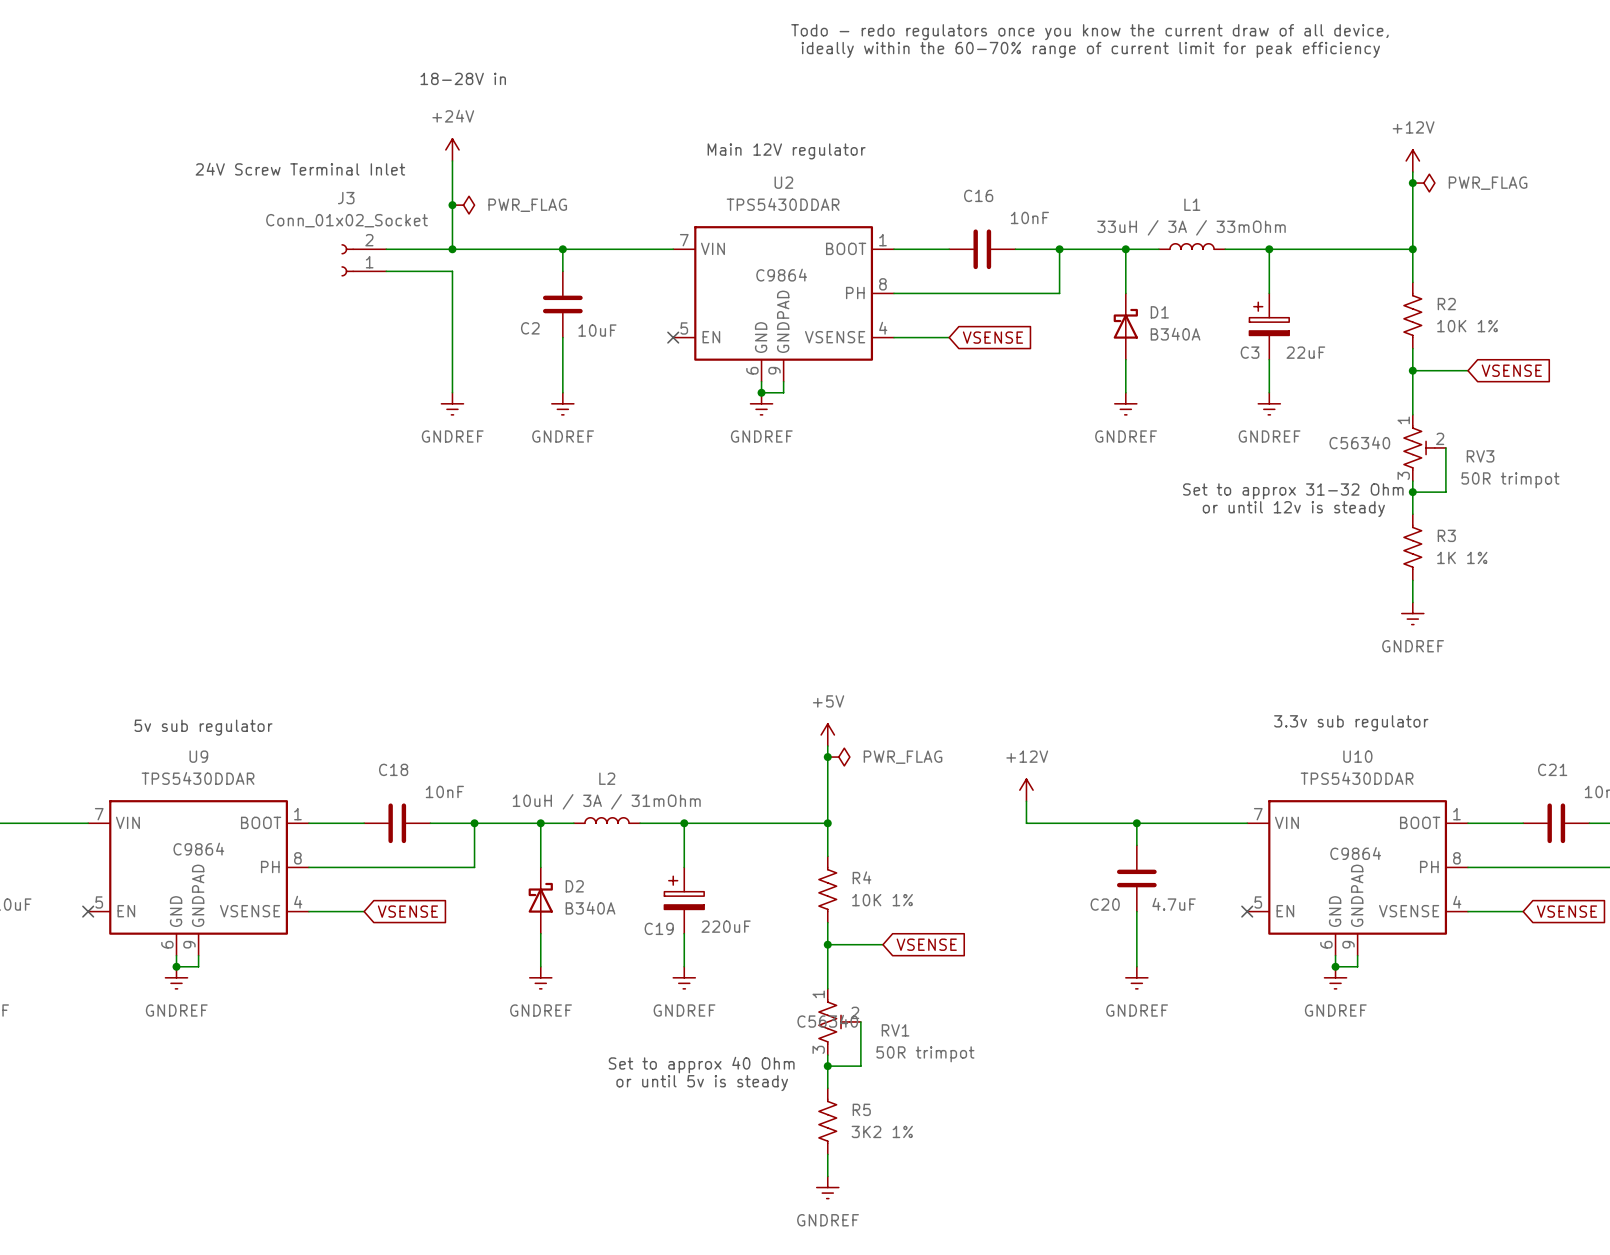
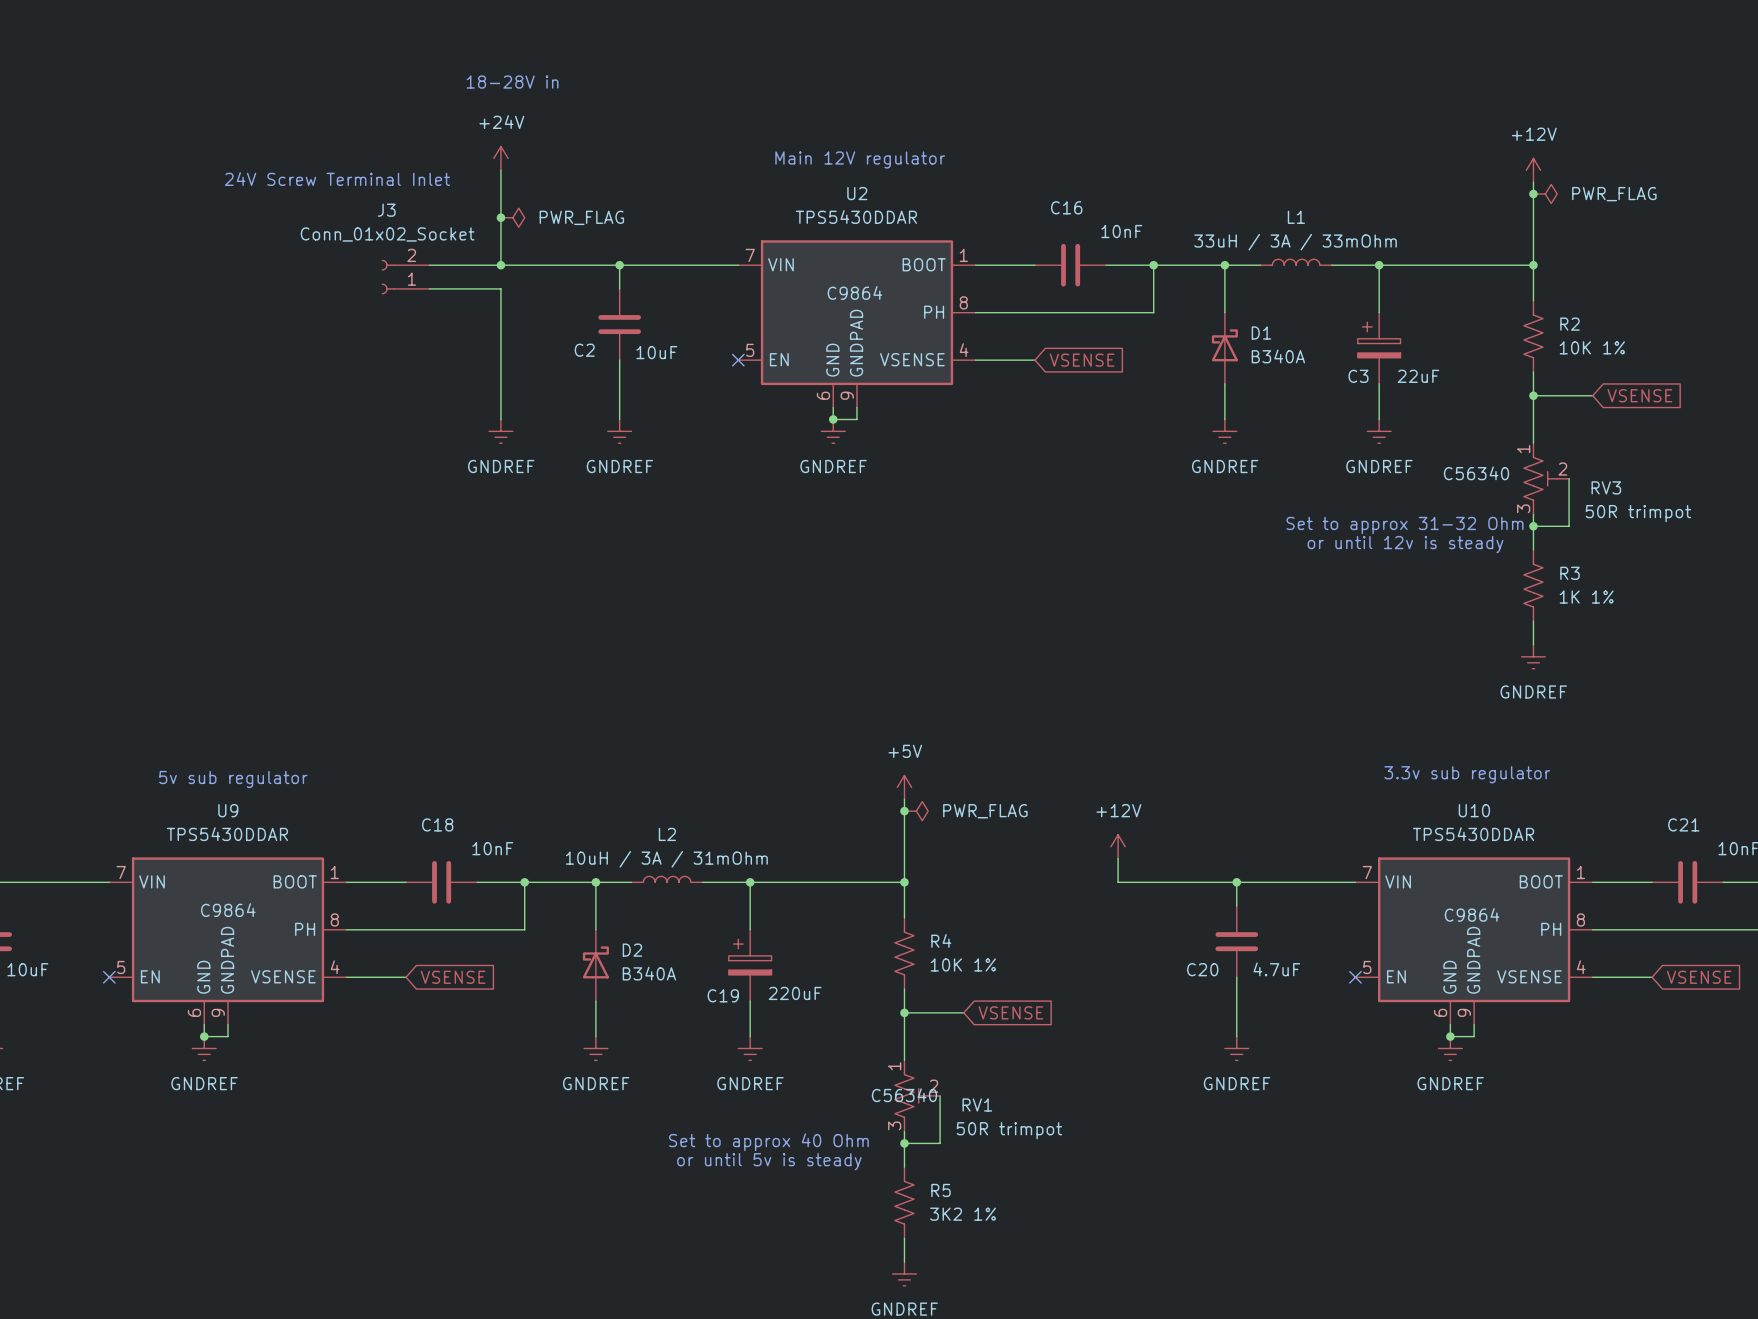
text: Todo - redo regulators once you know the current draw of all device, (1089, 32) -> none
text: ideally within the 60-70% range of current limit for peak efficiency (1090, 49) -> none

